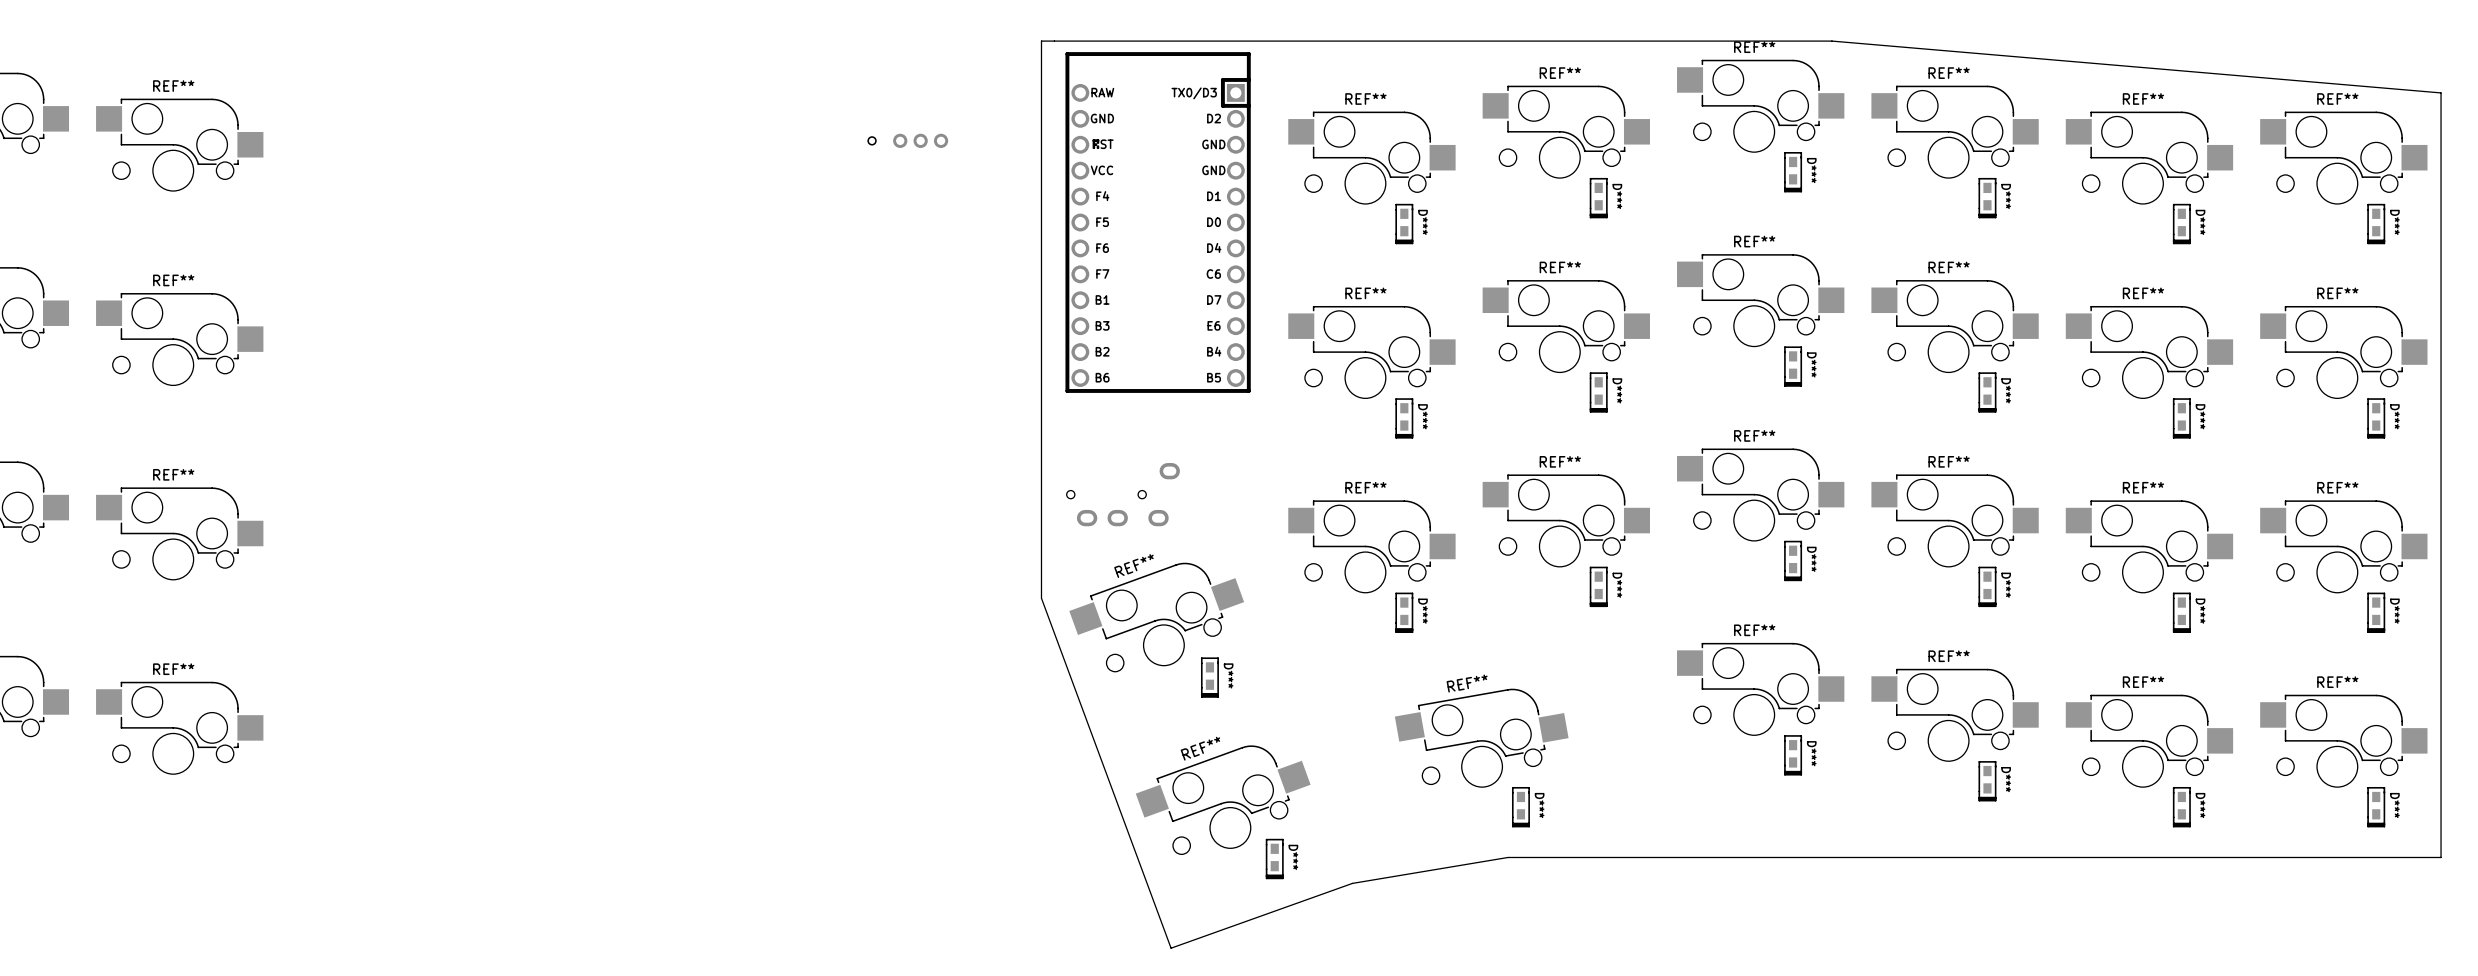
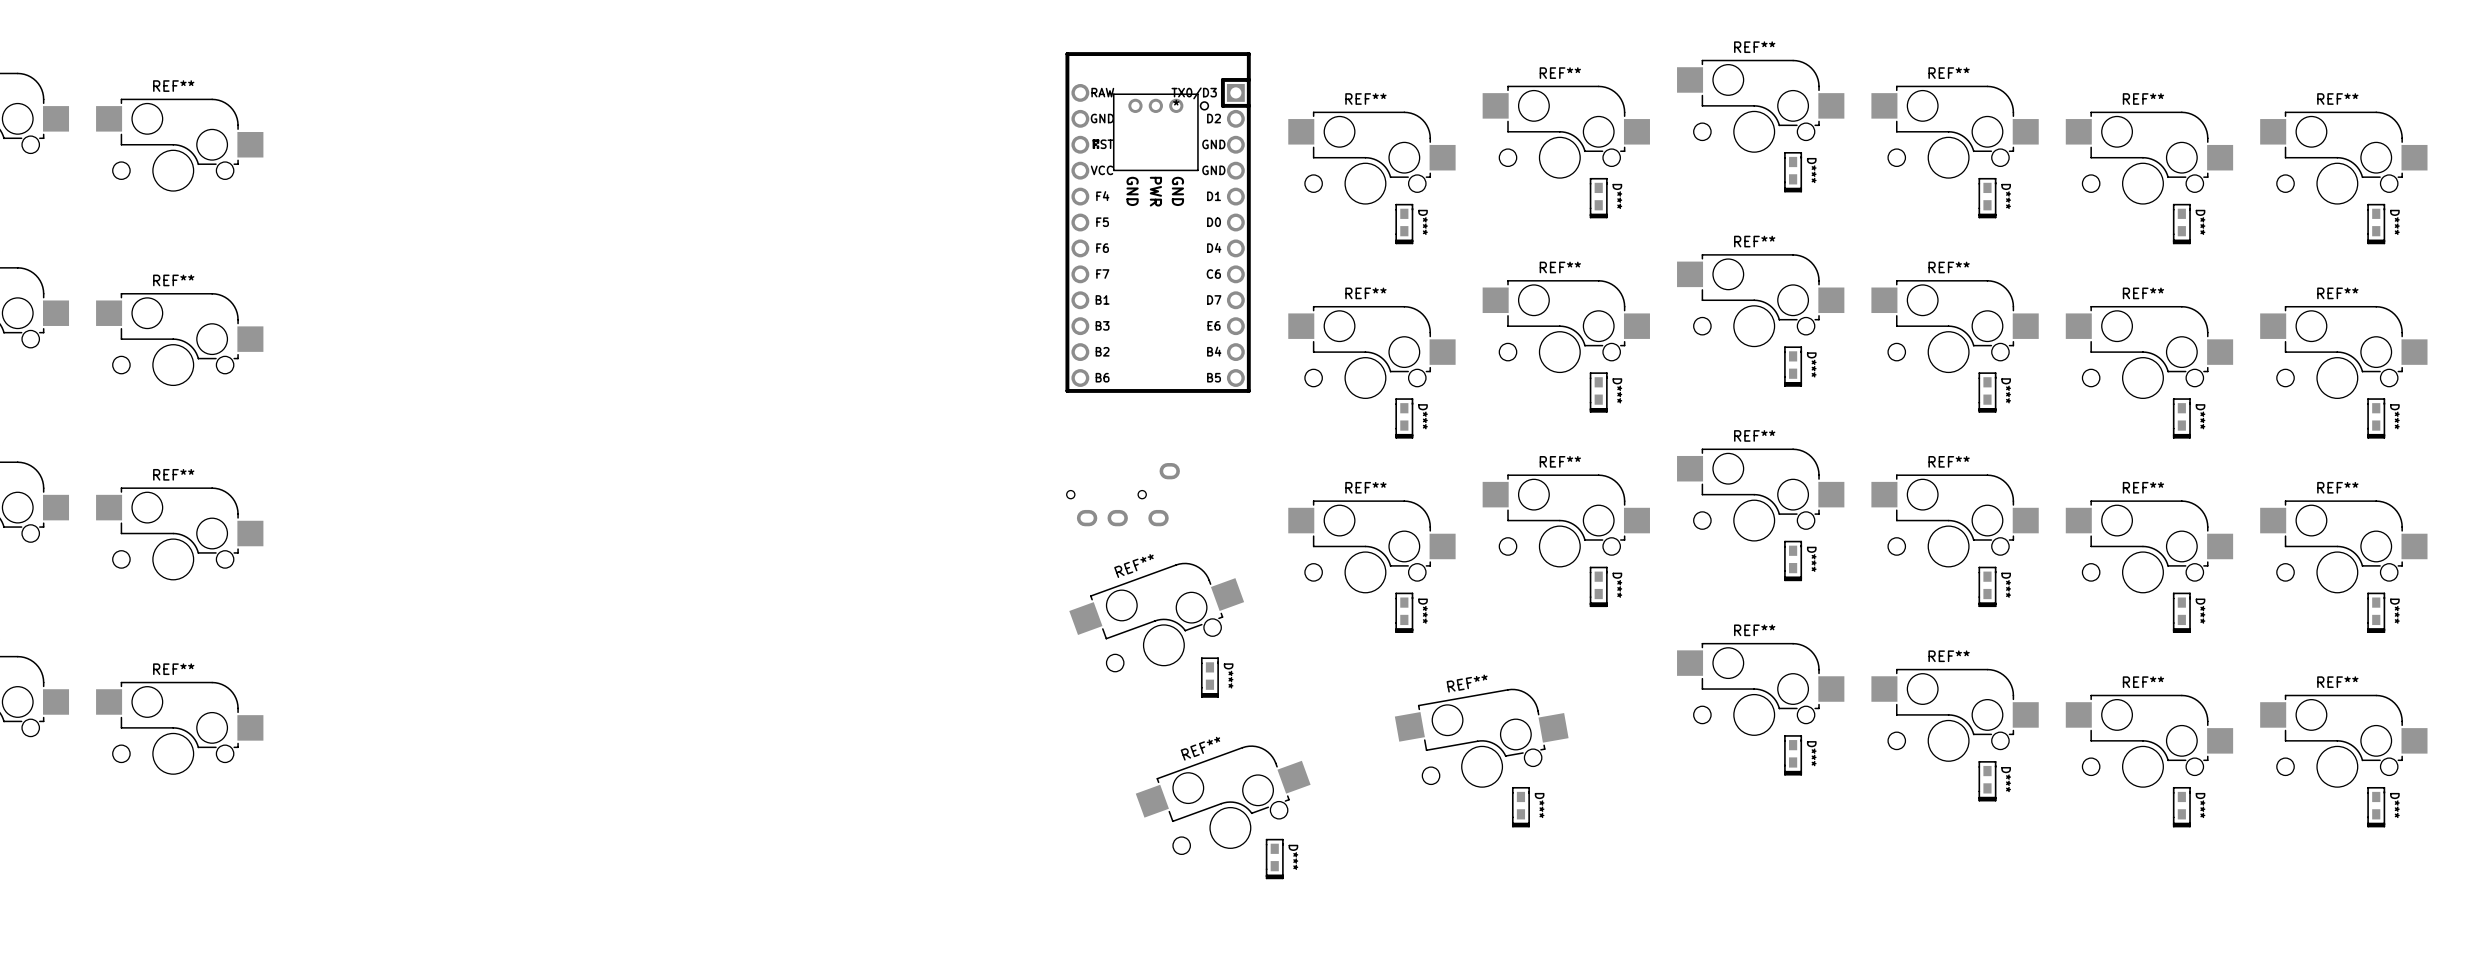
board edge: (1831, 41) (1041, 41) (1041, 598) (1171, 948) (1352, 883) (1508, 857) (2441, 857) (2441, 92) (1831, 41) -> none
part side: top (907, 140) -> bottom (1161, 132)
text: none -> GND (1132, 191)
text: none -> PWR (1155, 191)
text: none -> GND (1177, 191)

